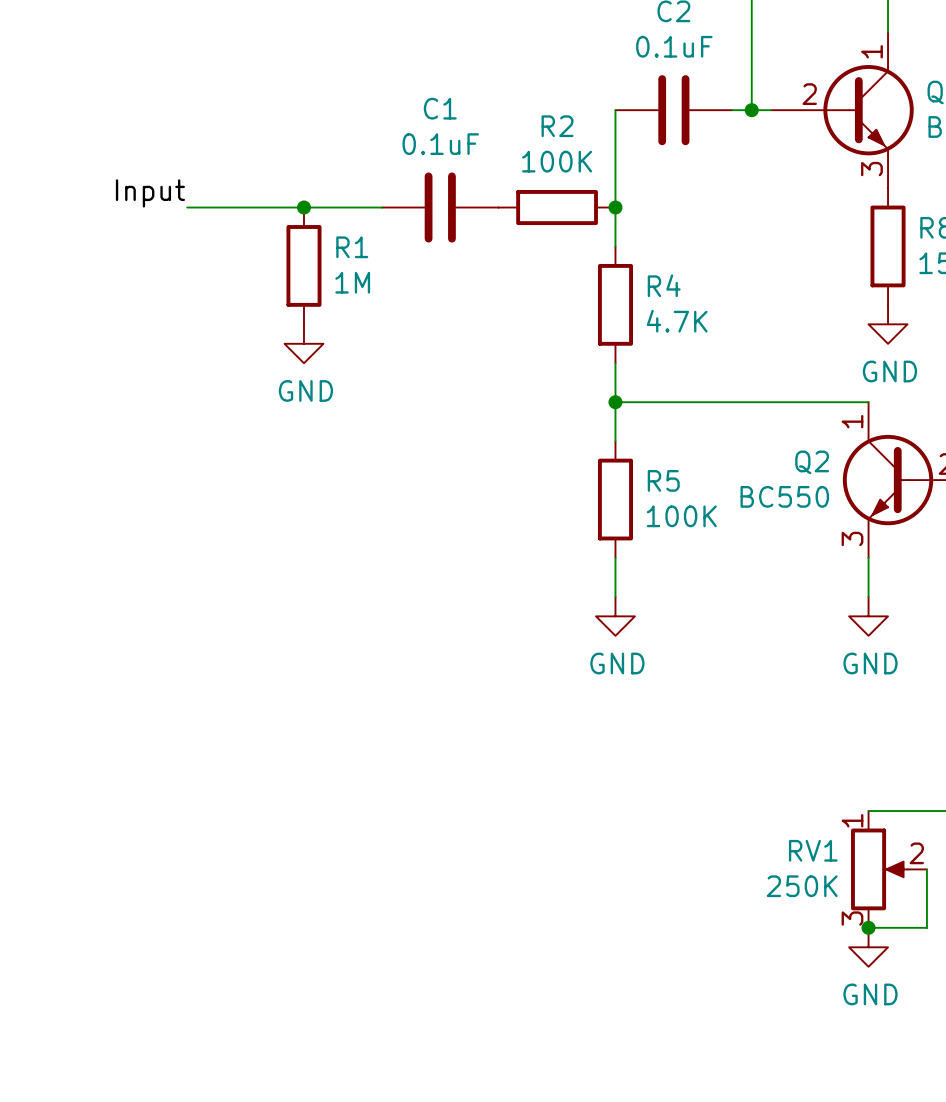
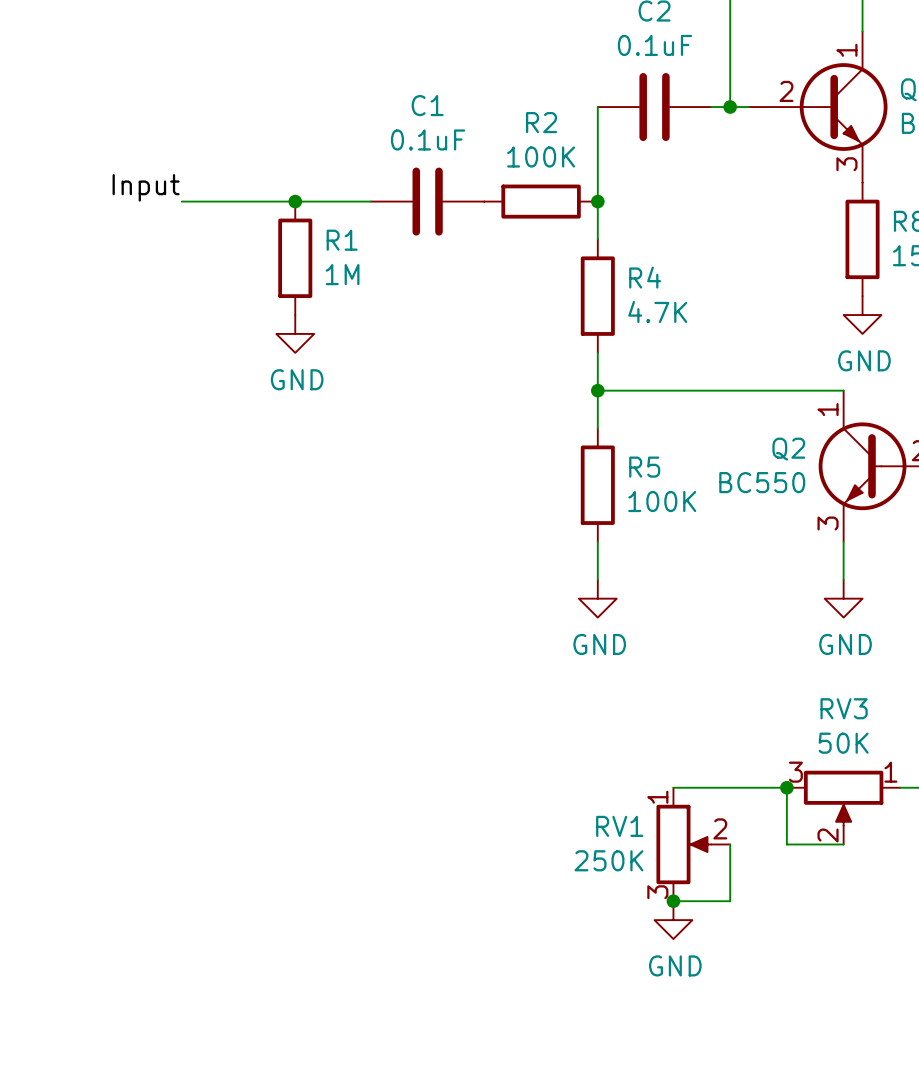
wire: none -> (673, 787) (786, 787) (786, 844) (843, 844)
junction: none -> (786, 787)
wire: (868, 811) (926, 811) -> none
RV3: none -> 50K (843, 807)
RV1 position: (888, 869) -> (693, 844)
wire: (926, 869) (926, 927) (868, 927) -> (730, 844) (730, 901) (673, 901)
junction: none -> (673, 901)
junction: (868, 927) -> none
power symbol position: GND (868, 947) -> GND (673, 920)

